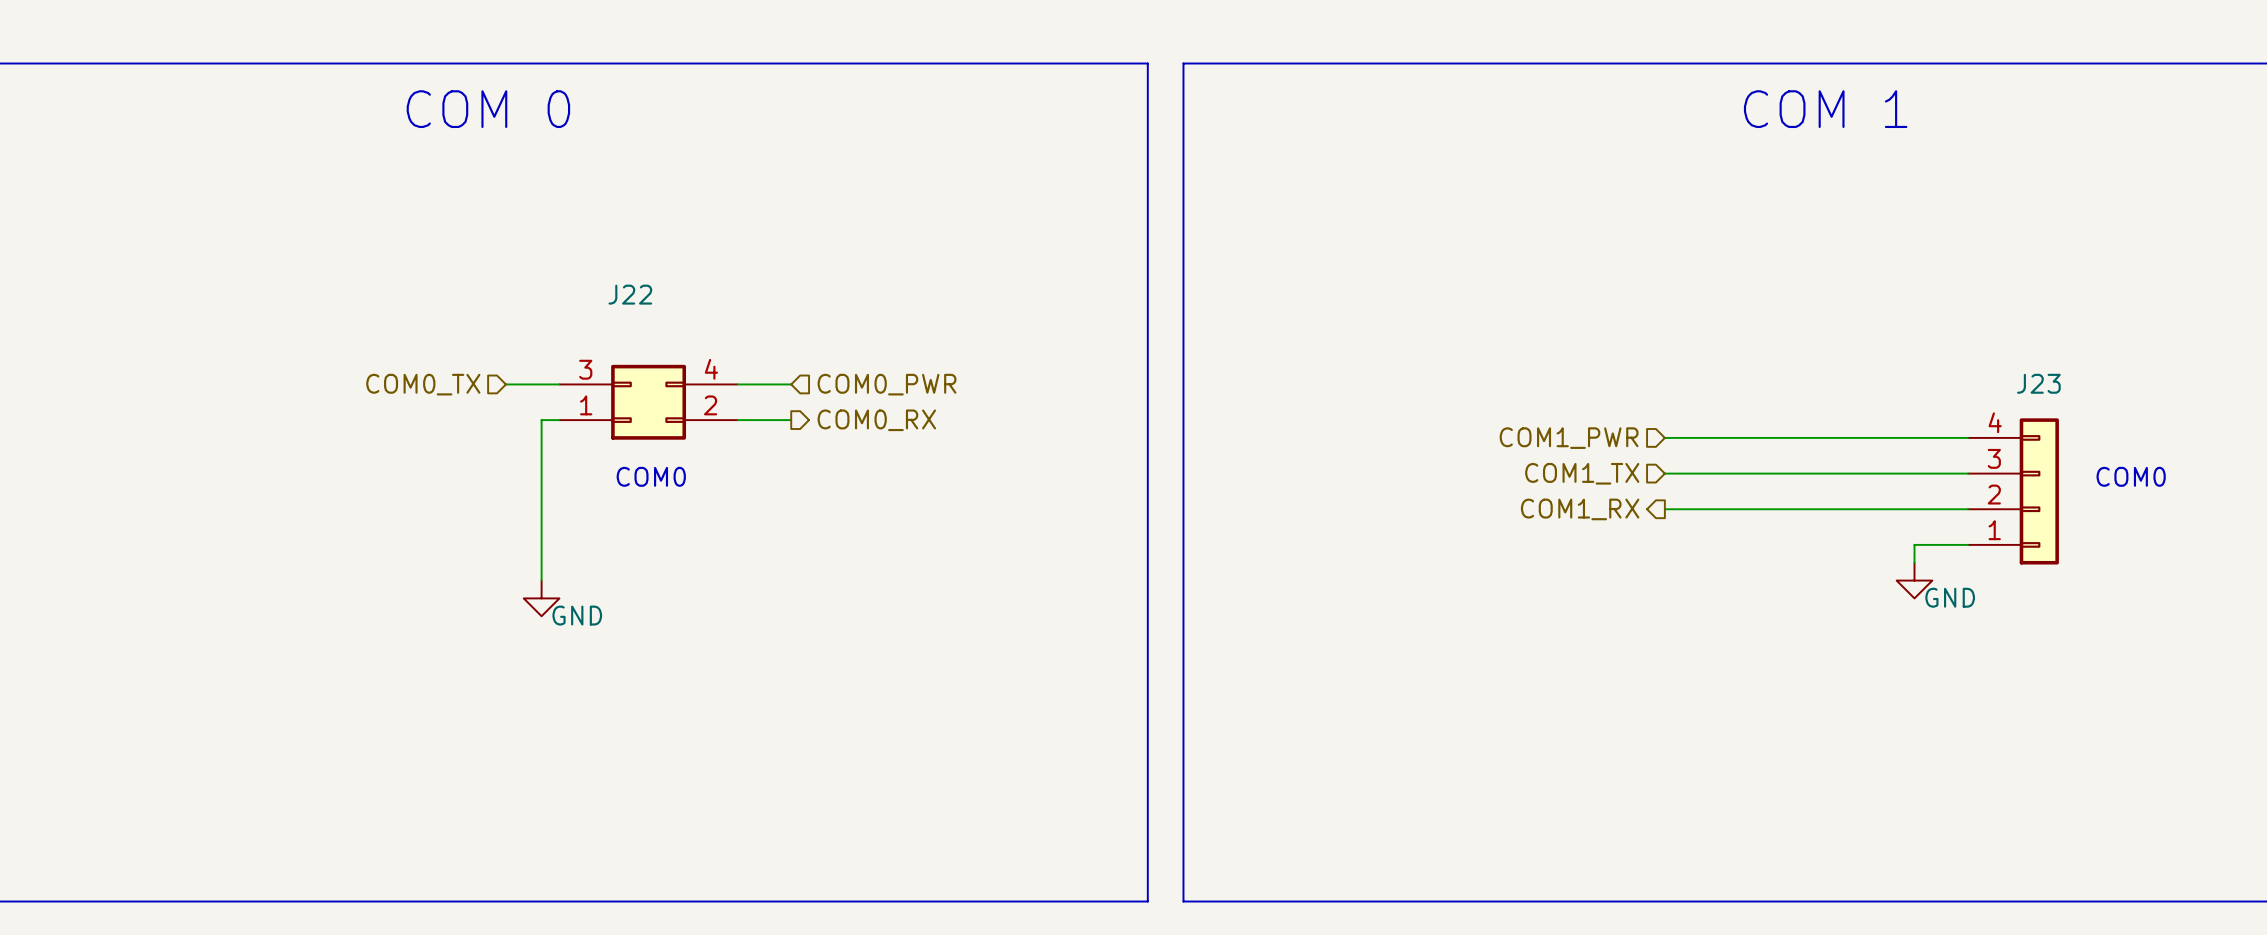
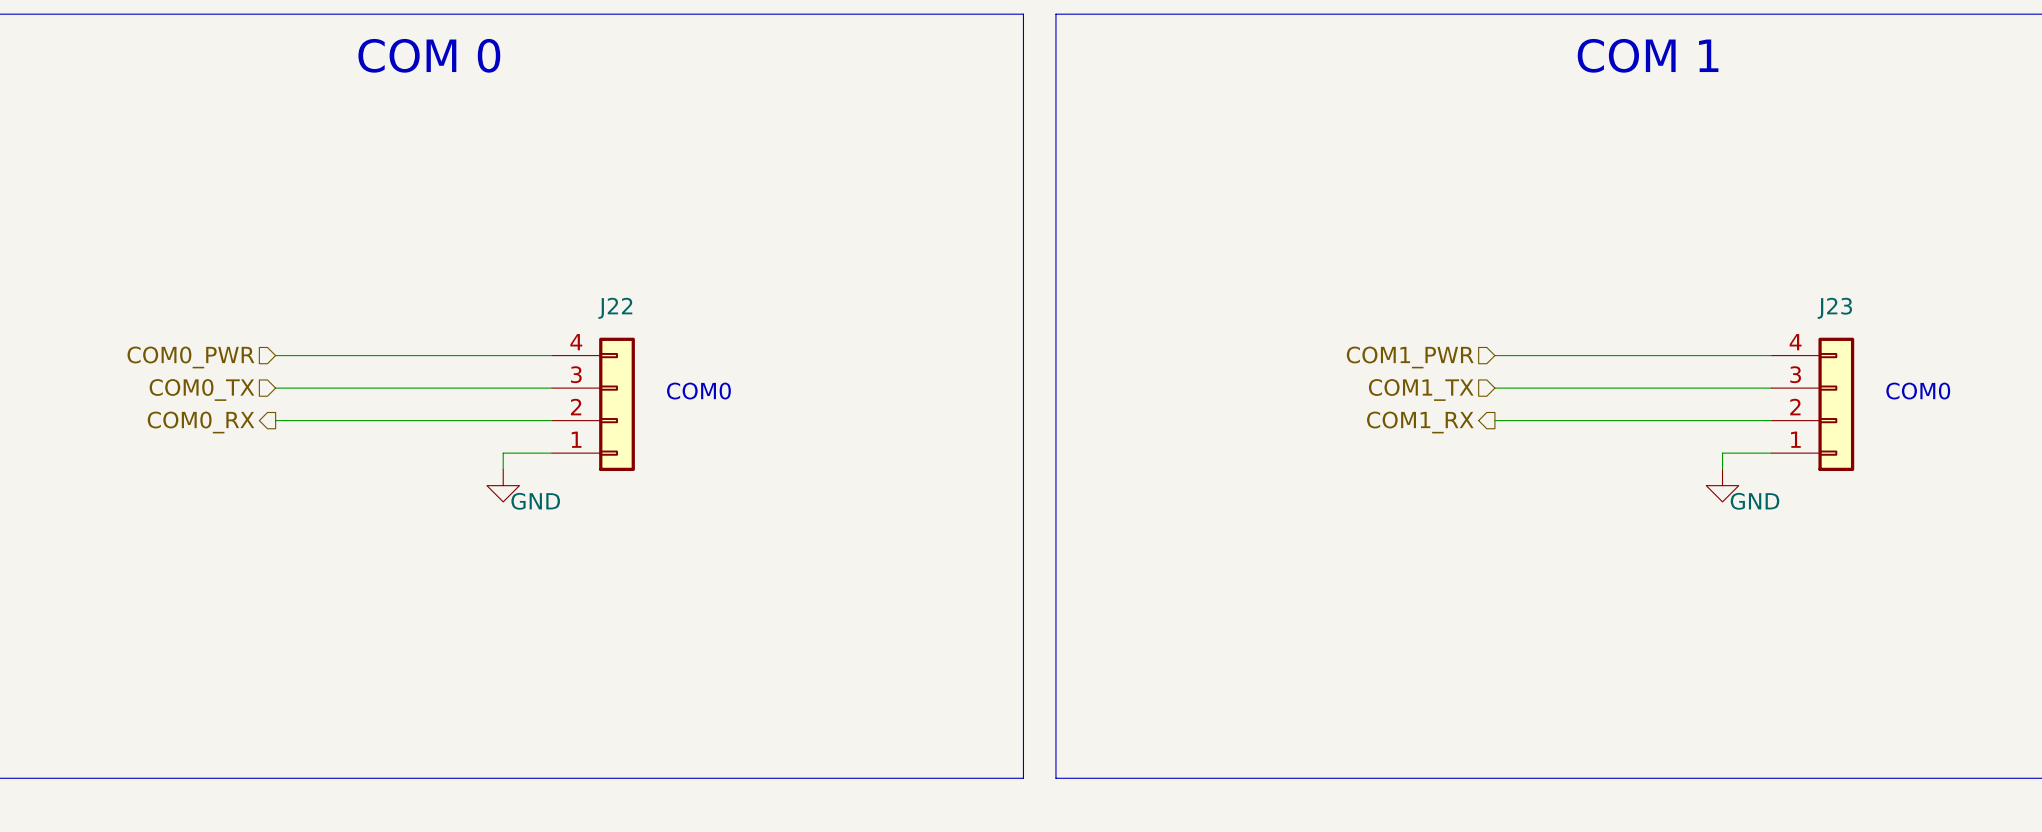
J22 name position: J22 (630, 294) -> J22 (615, 308)
J22 symbol: [559, 364, 738, 440] -> [551, 337, 635, 472]
hierarchical label position: COM0_TX (423, 384) -> COM0_TX (201, 389)
wire: (505, 384) (559, 384) -> none
wire: (737, 384) (791, 384) -> none
hierarchical label: COM0_PWR (887, 384) -> none
wire: (559, 420) (541, 420) (541, 580) -> none
wire: (737, 420) (791, 420) -> none
hierarchical label: COM0_RX (876, 420) -> none
wire: none -> (275, 355) (551, 355)
hierarchical label: none -> COM0_PWR (190, 357)
wire: none -> (275, 388) (551, 388)
text position: COM0 (651, 476) -> COM0 (698, 391)
hierarchical label: none -> COM0_RX (201, 422)
wire: none -> (275, 420) (551, 420)
wire: none -> (551, 453) (503, 453) (503, 469)
power symbol position: GND (541, 598) -> GND (503, 485)

